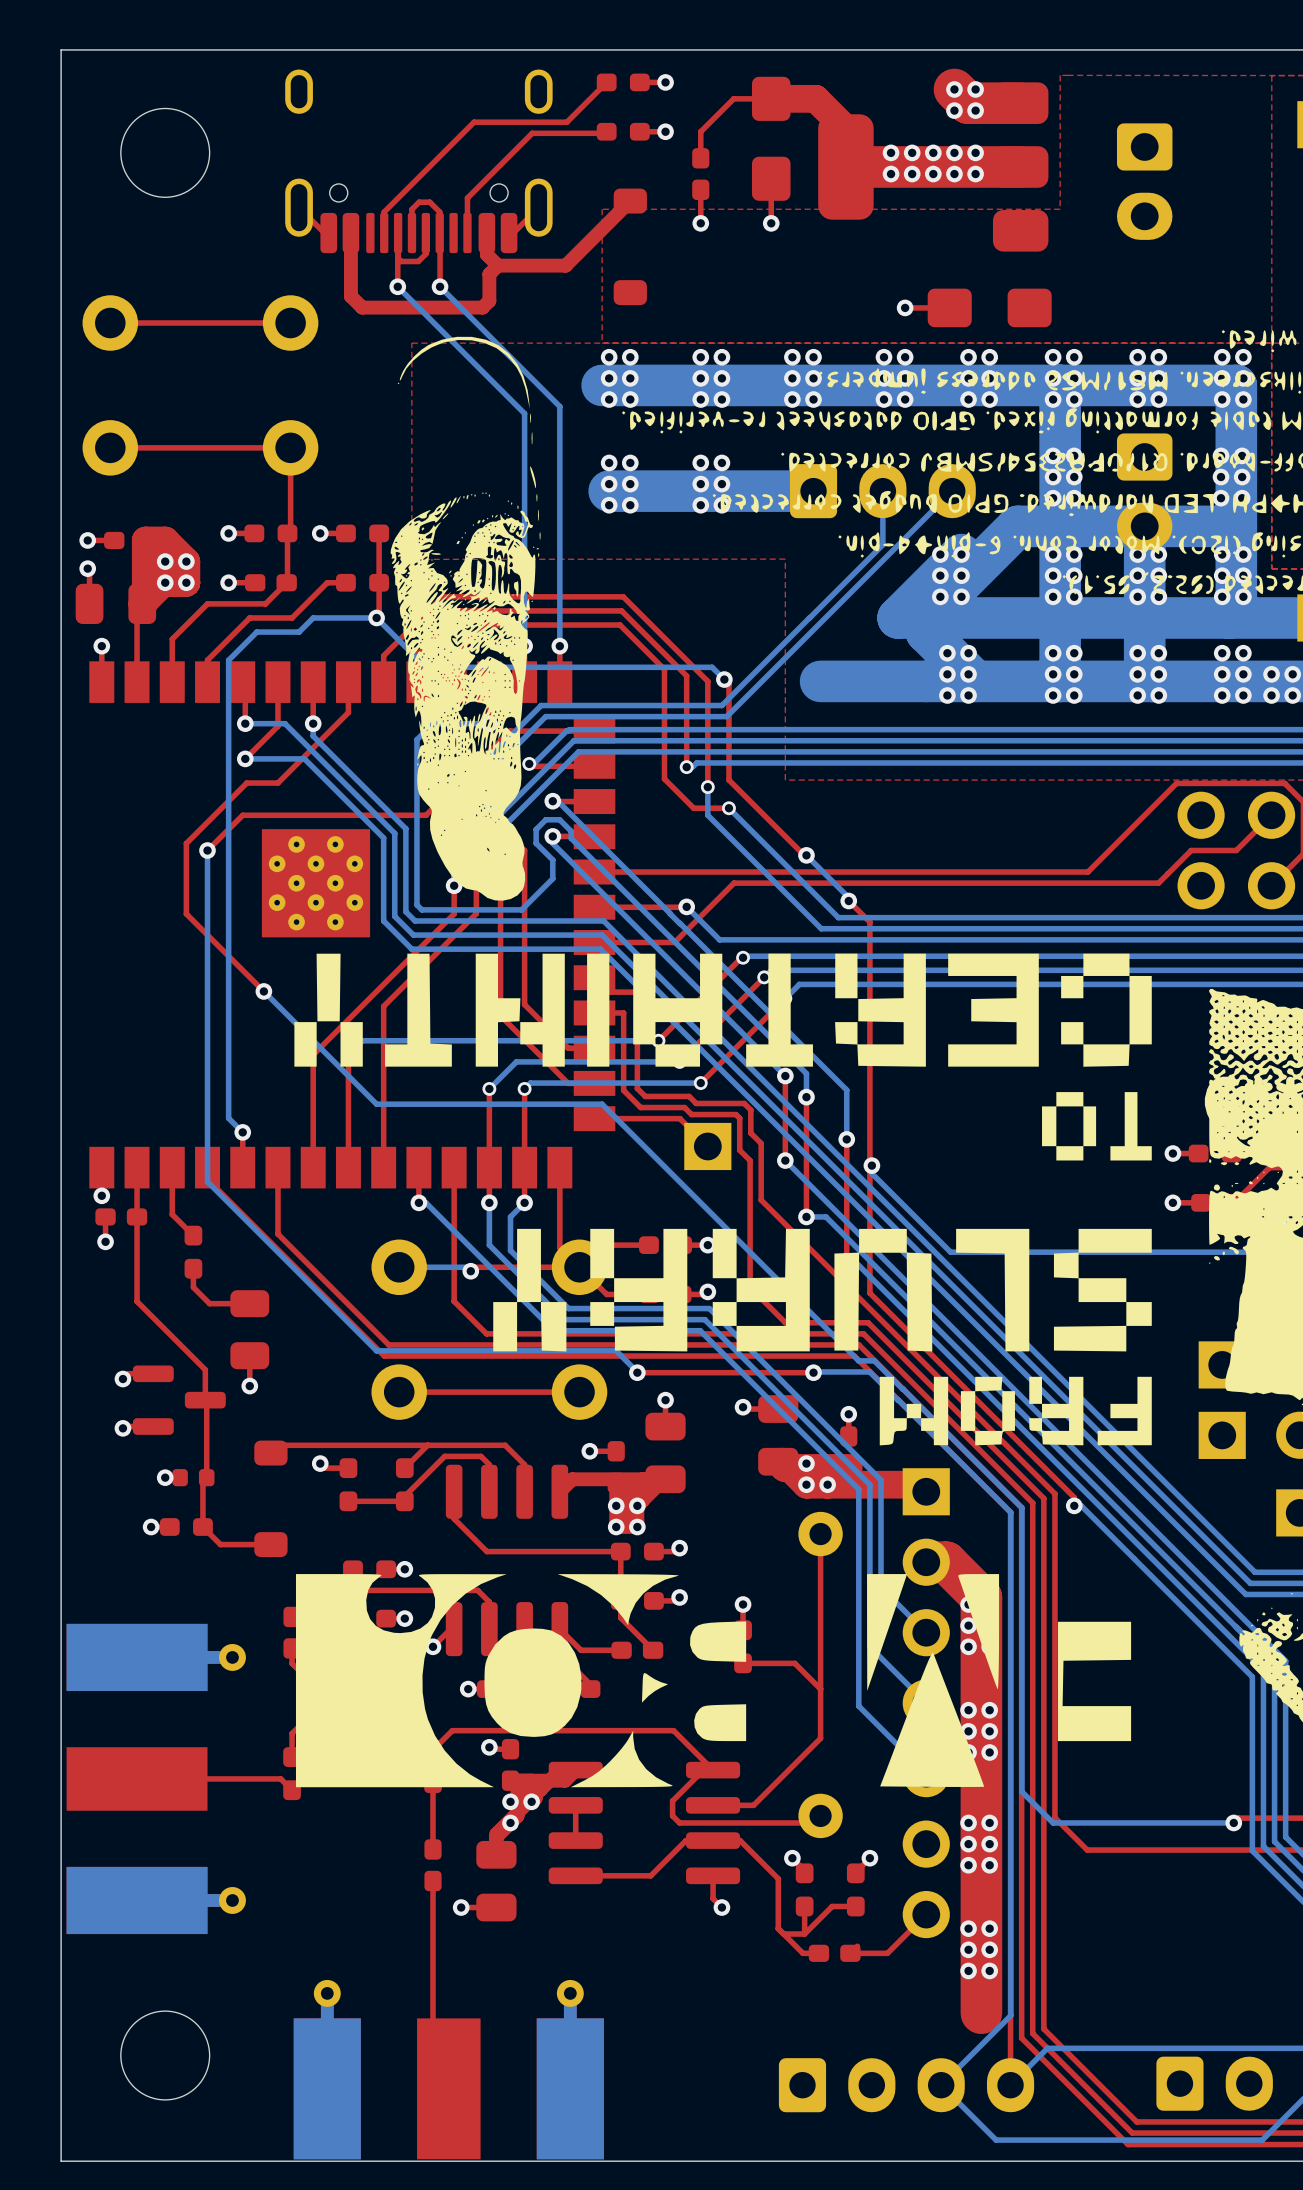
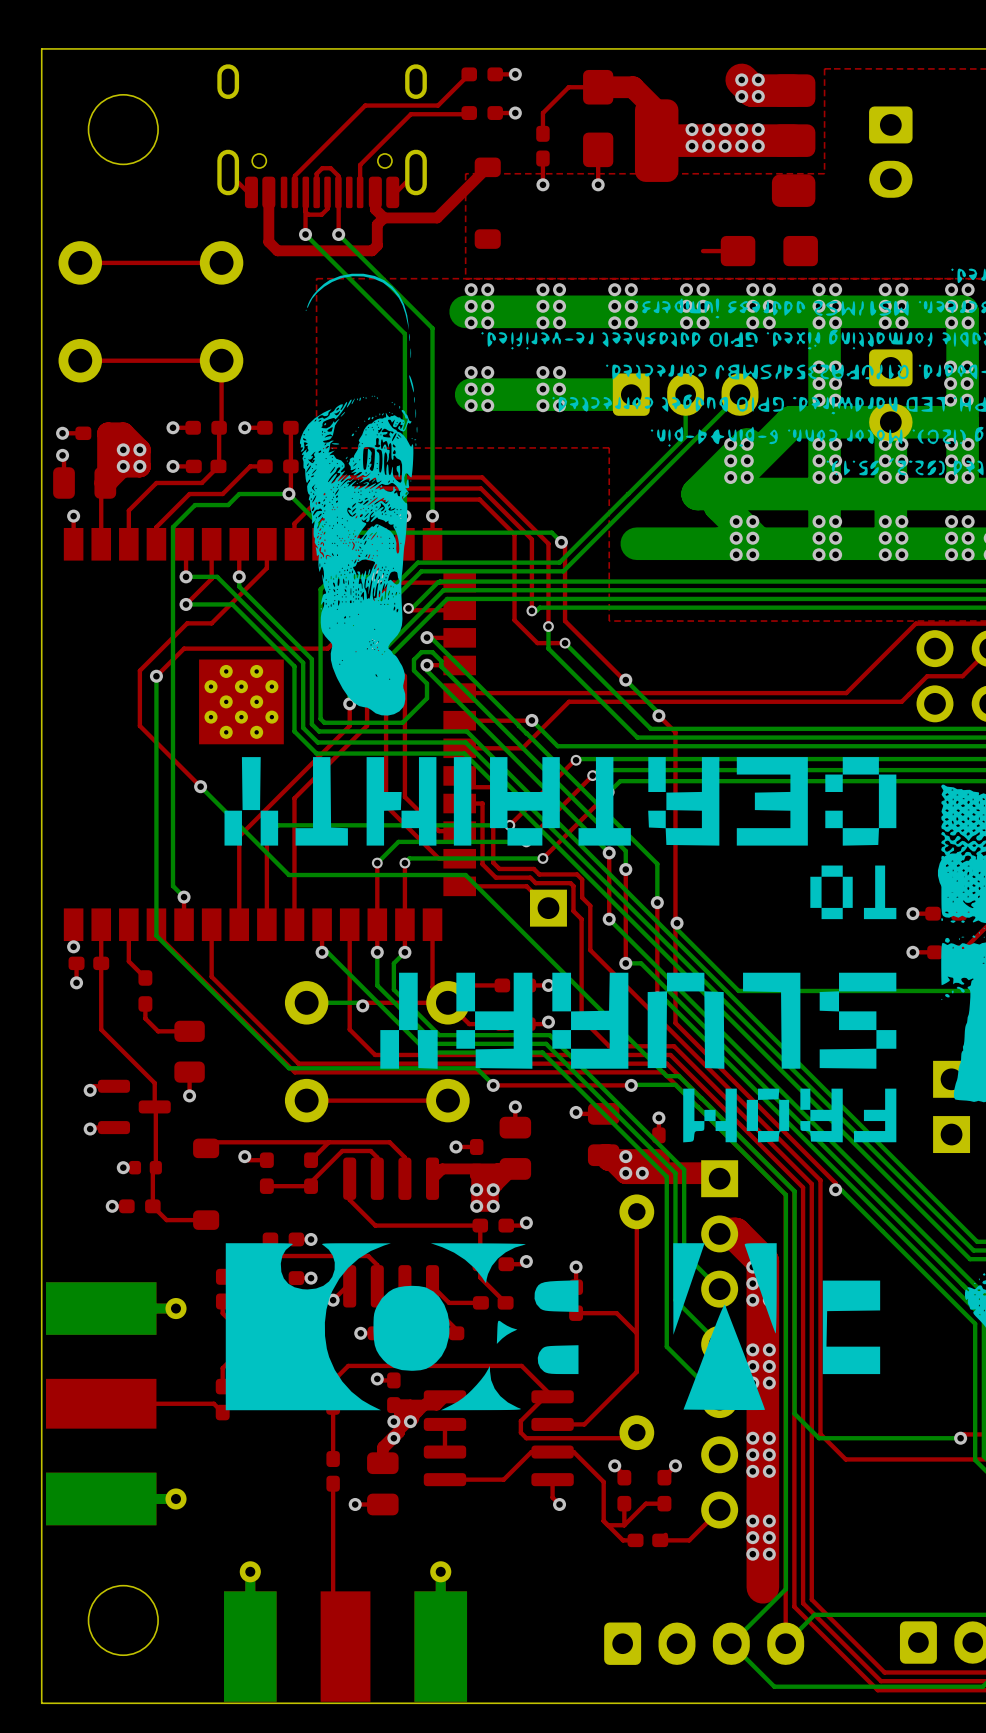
via: (905, 307) -> none

